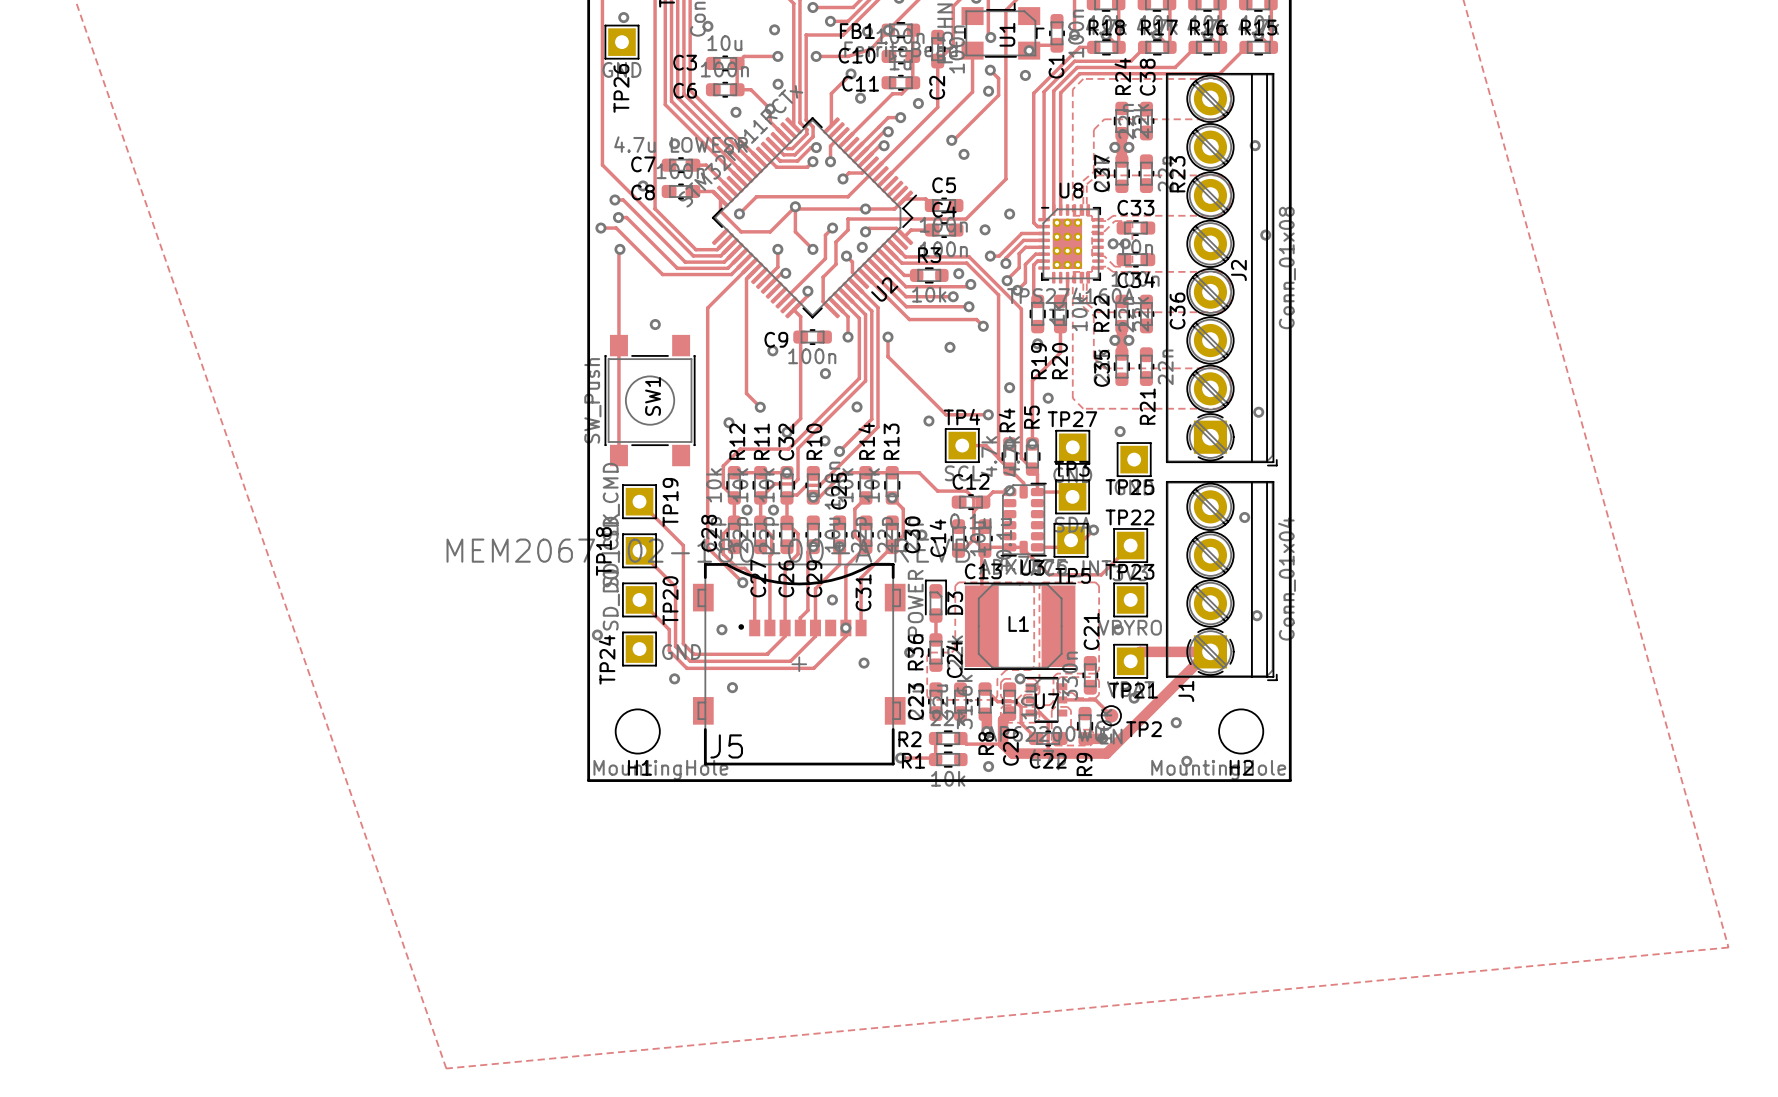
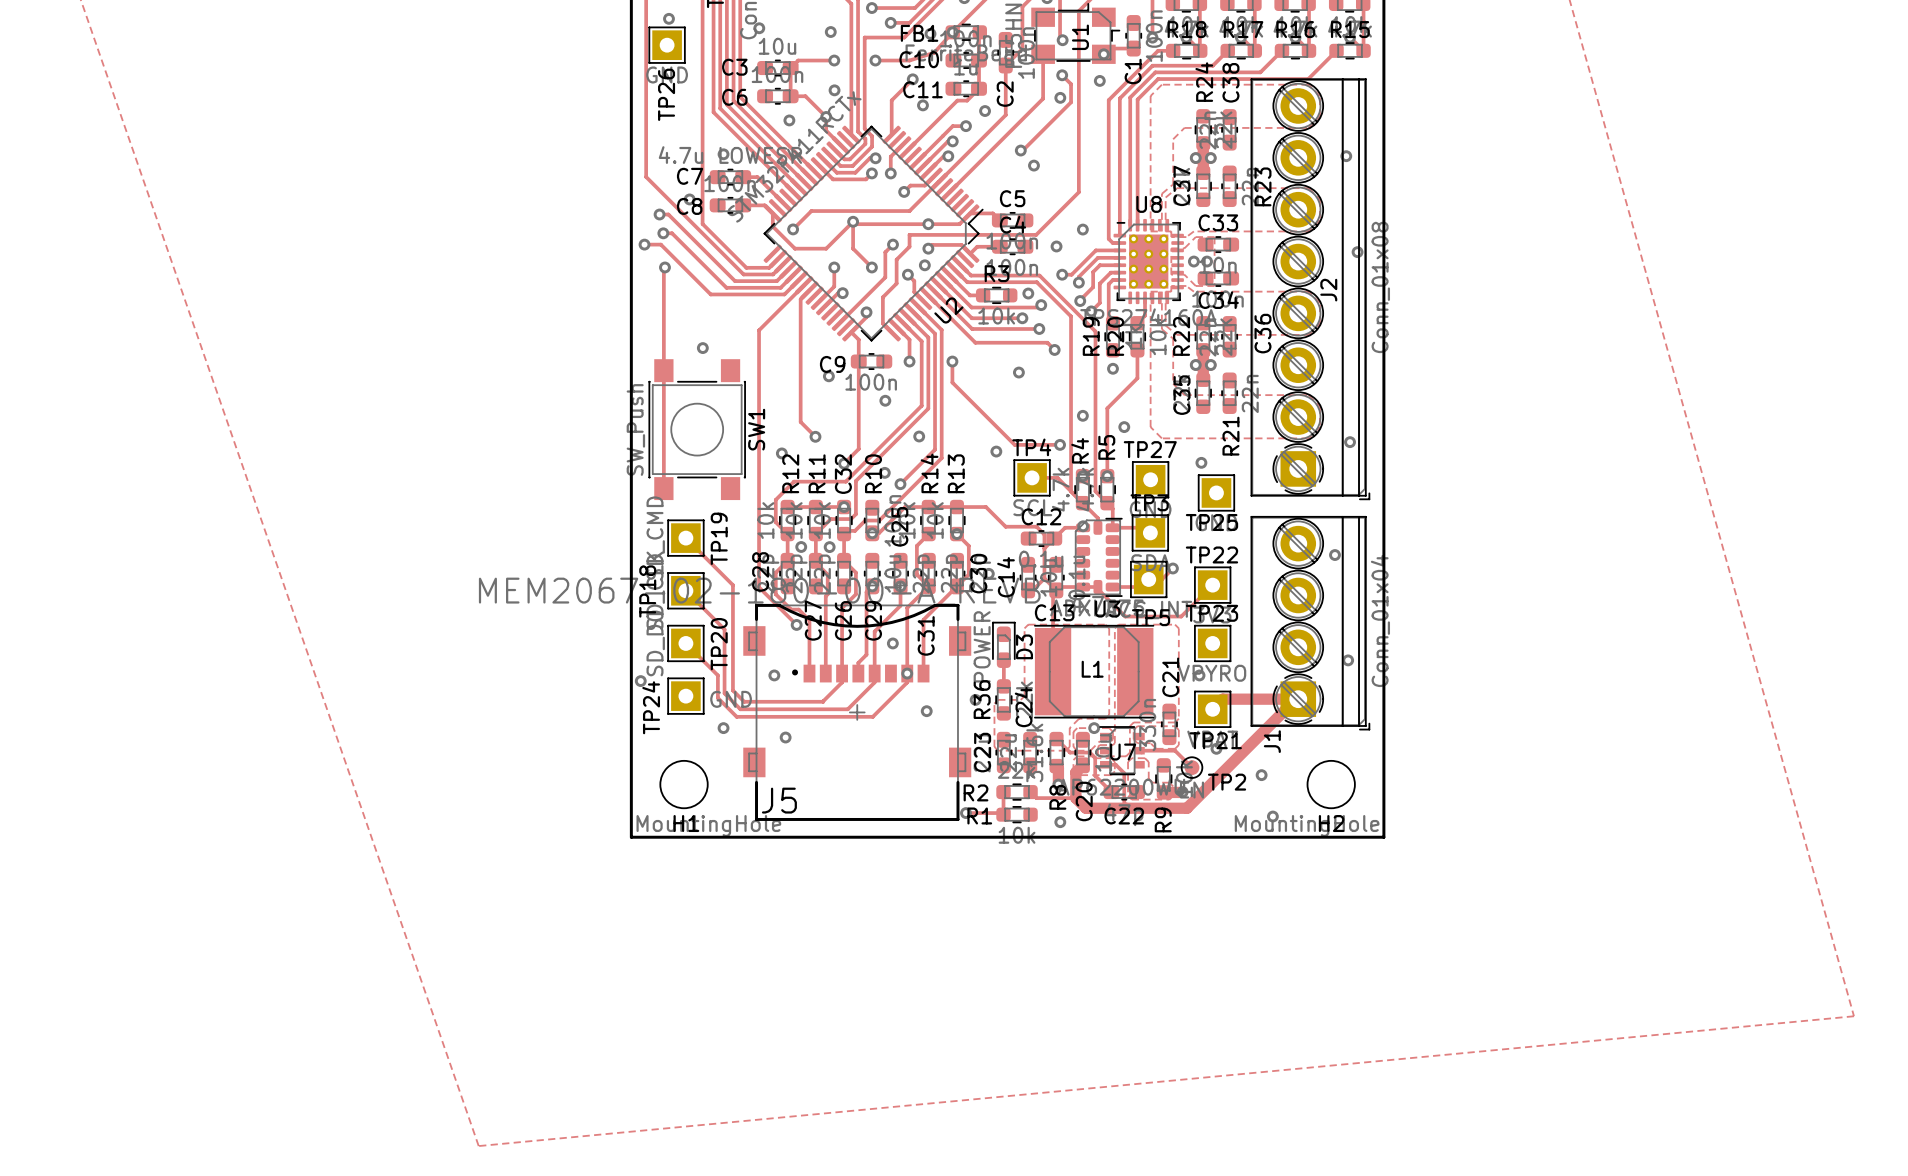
U8 footprint: [1038, 204, 1104, 284] -> [1113, 218, 1184, 305]
R19 name position: R19 (1038, 361) -> R19 (1091, 336)
R20 name position: R20 (1059, 361) -> R20 (1115, 336)
SW1 name position: SW1 (653, 396) -> SW1 (756, 429)

